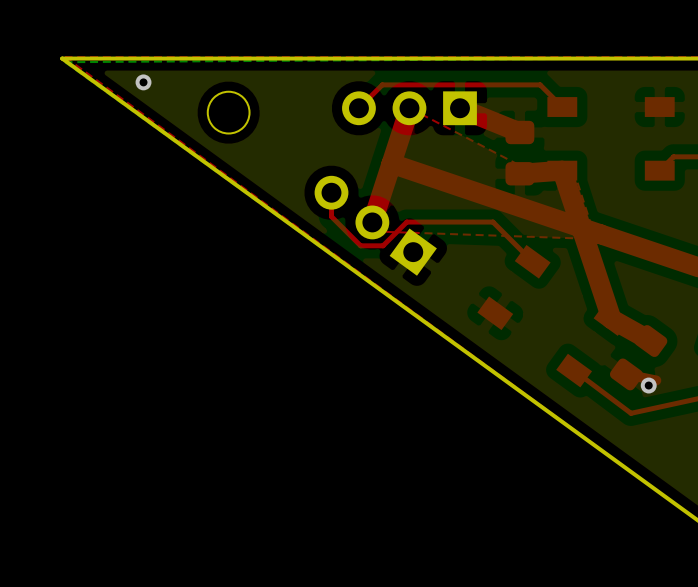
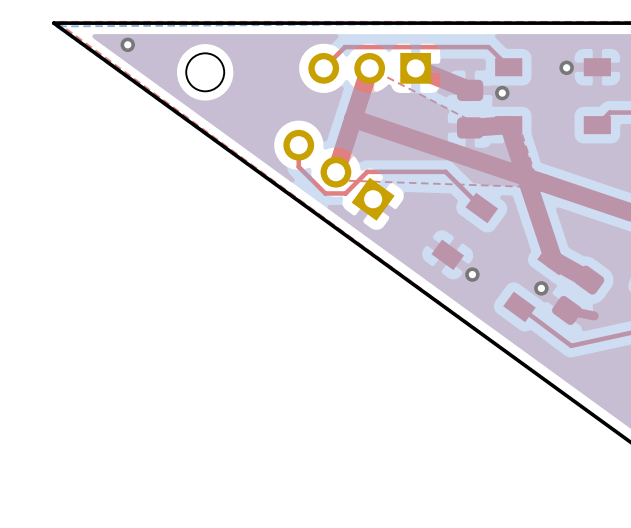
via: none -> (566, 67)
via: none -> (502, 93)
via: none -> (472, 274)
via position: (648, 385) -> (541, 288)

